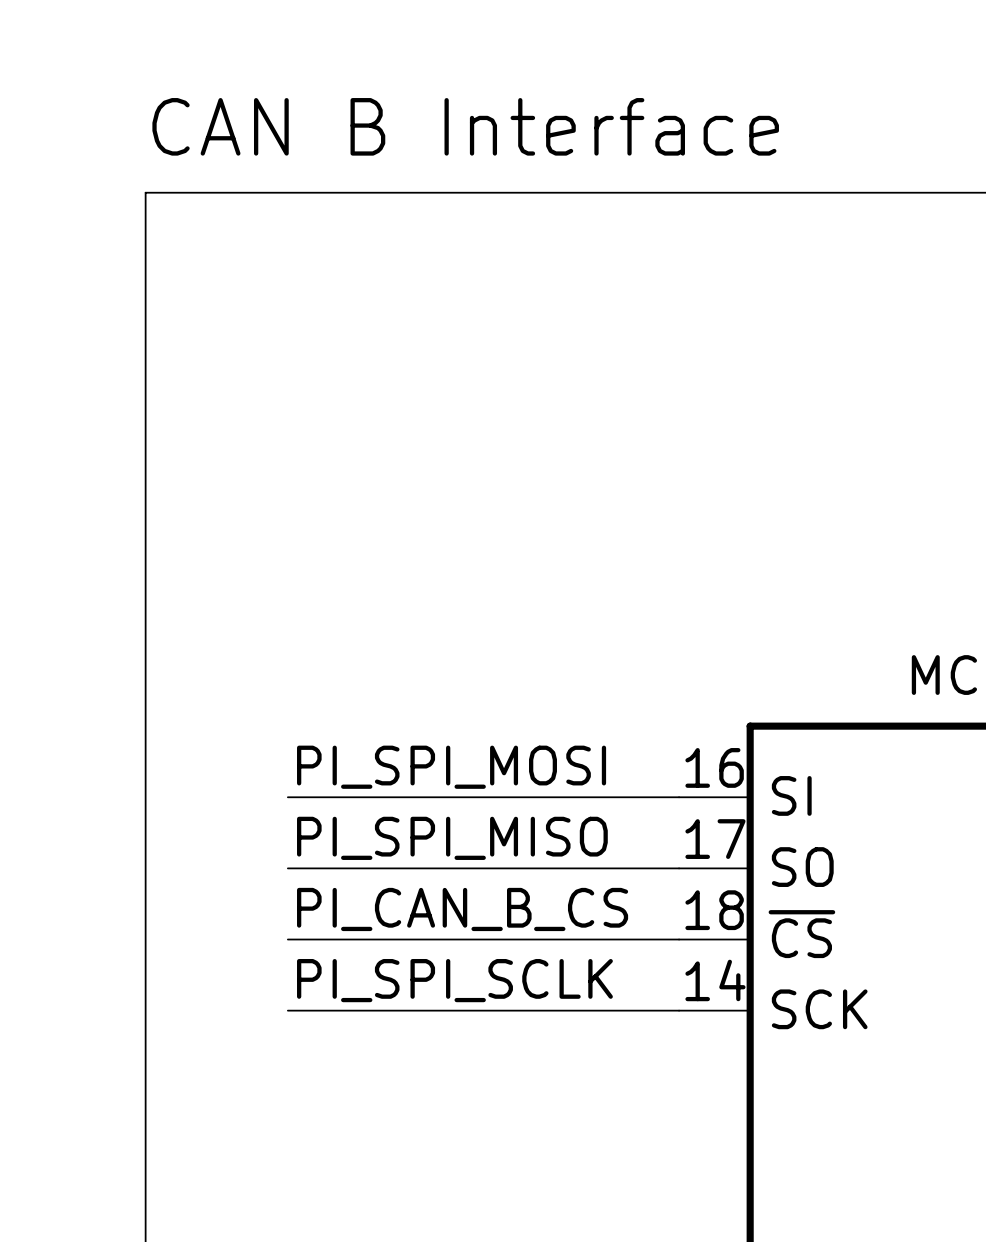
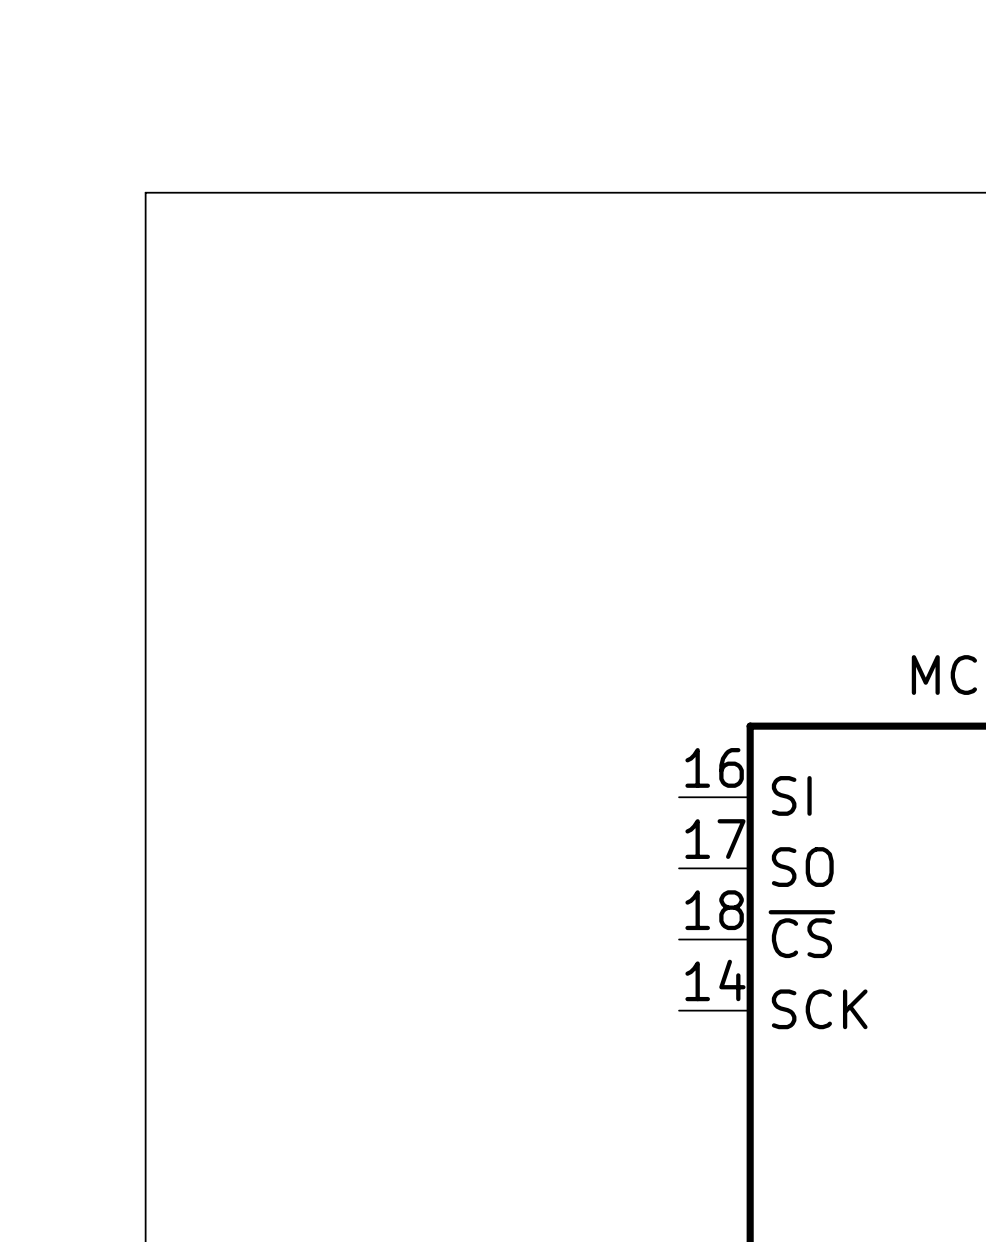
text: CAN B Interface (465, 126) -> none
label: PI_SPI_MOSI (451, 767) -> none
wire: (287, 797) (679, 797) -> none
label: PI_SPI_MISO (452, 838) -> none
wire: (287, 868) (679, 868) -> none
label: PI_CAN_B_CS (462, 909) -> none
wire: (287, 939) (679, 939) -> none
label: PI_SPI_SCLK (454, 980) -> none
wire: (287, 1010) (679, 1010) -> none

